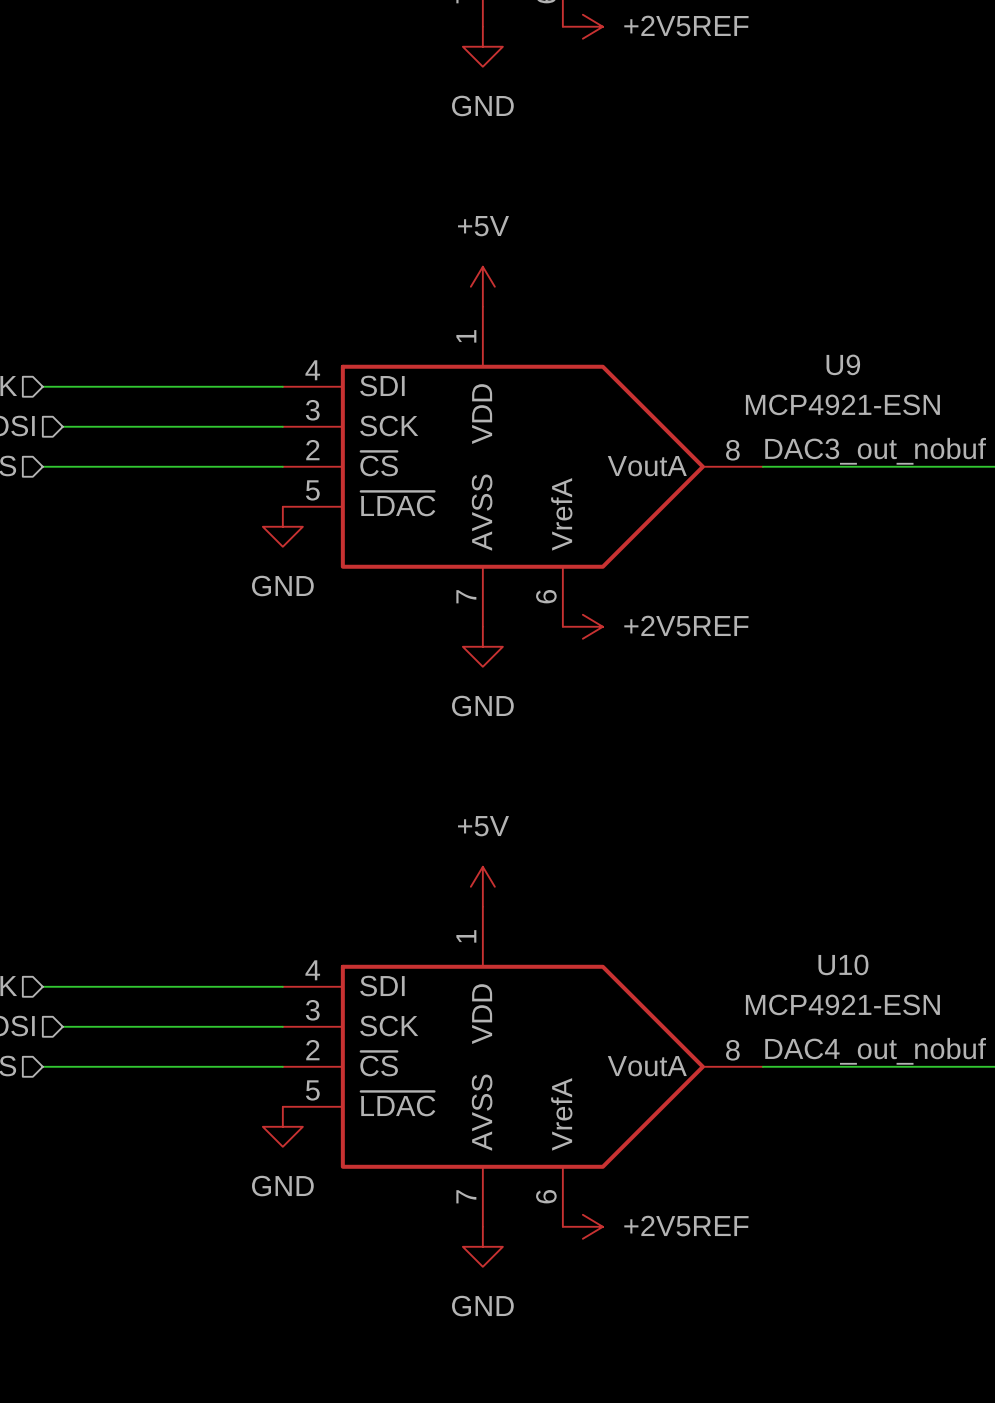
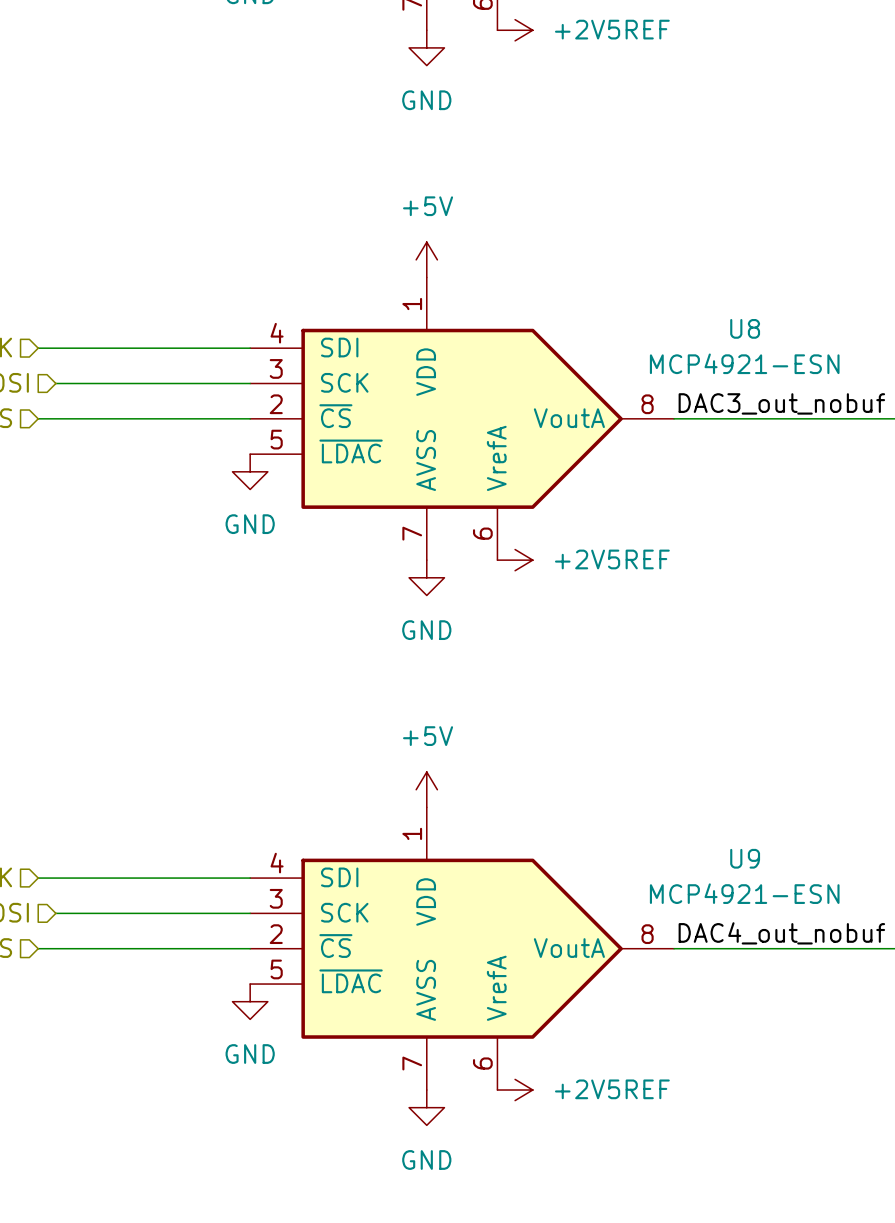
U9 name: U9 (843, 364) -> U8 (745, 328)
U10 name: U10 (843, 964) -> U9 (745, 858)

